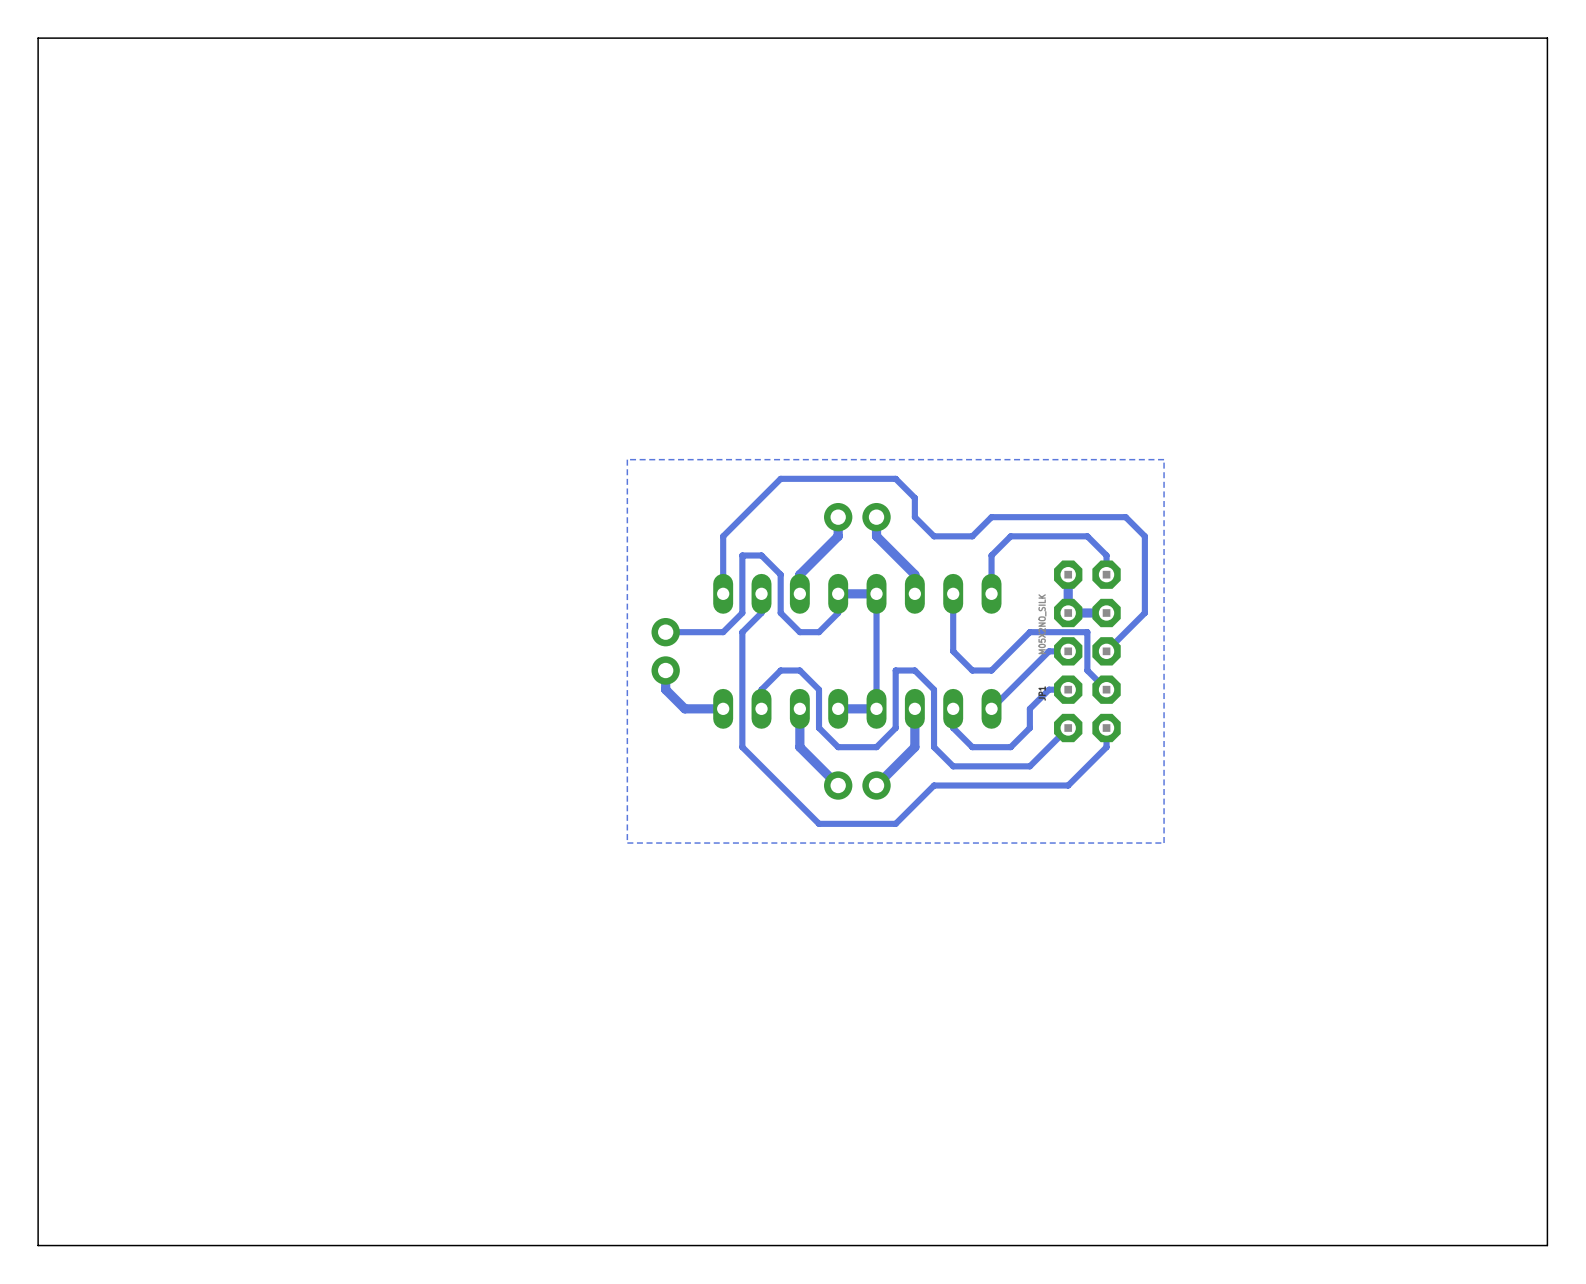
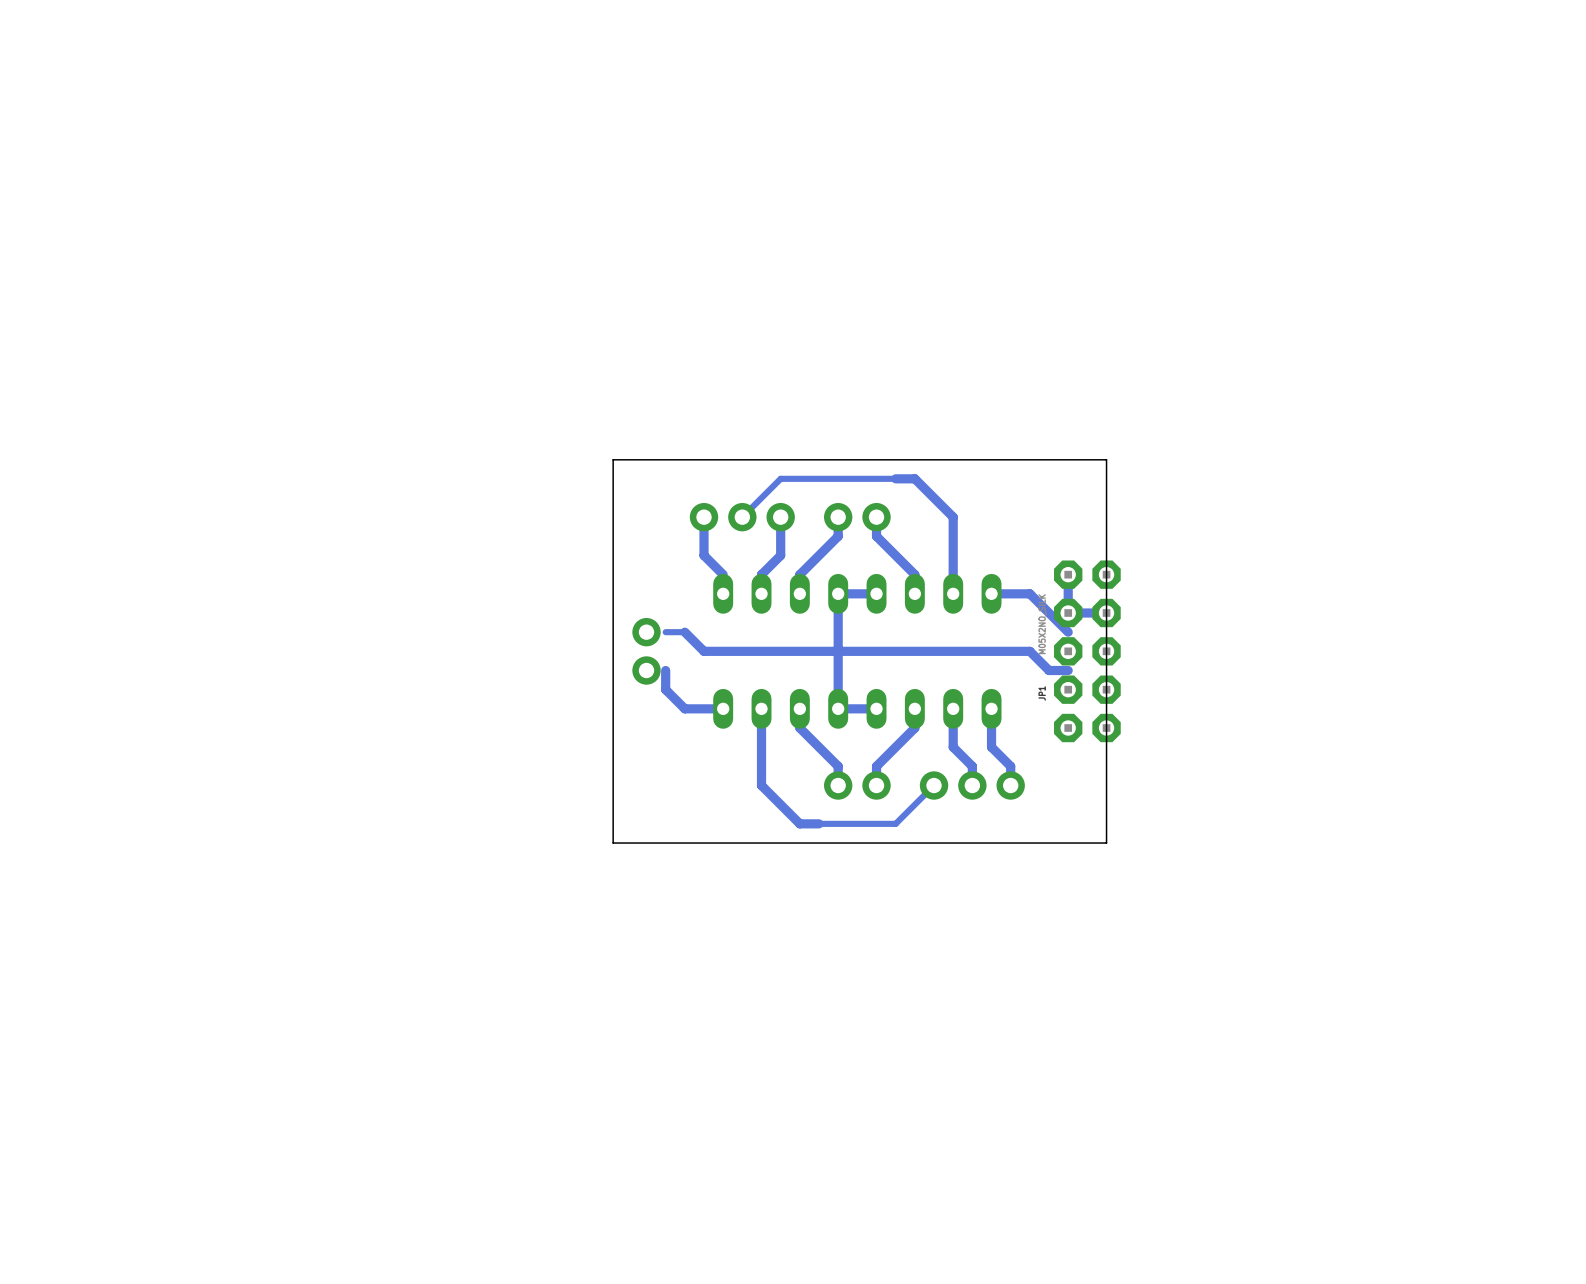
board edge: (1547, 38) (38, 38) (38, 1245) (1547, 1245) (1547, 38) -> none
board edge: none -> (1106, 459) (613, 459) (613, 843) (1106, 843) (1106, 459)
zone outline: (1164, 459) (627, 459) (627, 843) (1164, 843) (1164, 459) -> none
track: (895, 478) (914, 497) (914, 517) (934, 536) (972, 536) (991, 517) (1125, 517) (1144, 536) (1144, 613) (1106, 651) -> (895, 478) (914, 478) (953, 517) (953, 593)
track: (742, 517) (723, 536) (723, 574) -> (704, 517) (704, 555) (723, 574)
part: none -> (742, 517)
track: none -> (780, 517) (780, 555) (761, 574) (761, 593)
track: (1106, 574) (1106, 555) (1087, 536) (1010, 536) (991, 555) (991, 593) -> (1068, 632) (1029, 593) (991, 593)
track: (761, 593) (761, 613) (742, 632) (742, 747) (819, 823) -> (761, 708) (761, 785) (799, 823) (819, 823)
track: (876, 593) (876, 708) -> none
track: (953, 593) (953, 651) (972, 670) (991, 670) (1029, 632) (1087, 632) (1087, 670) (1106, 689) -> none
track: (838, 613) (819, 632) (799, 632) (780, 613) (780, 574) (761, 555) (742, 555) (742, 613) (723, 632) (684, 632) -> (838, 613) (838, 708)
track: none -> (684, 632) (704, 651) (1029, 651) (1049, 670) (1068, 670)
part position: (665, 651) -> (646, 651)
track: (1068, 651) (1049, 651) (991, 708) -> (1010, 785) (1010, 766) (991, 747) (991, 708)
track: (1068, 689) (1049, 689) (1029, 708) (1029, 728) (1010, 747) (972, 747) (953, 728) -> (972, 785) (972, 766) (953, 747) (953, 728)
track: (761, 708) (761, 689) (780, 670) (799, 670) (819, 689) (819, 728) (838, 747) (876, 747) (895, 728) (895, 670) (914, 670) (934, 689) (934, 747) (953, 766) (1029, 766) (1068, 728) -> none
track: (799, 728) (799, 747) (838, 785) -> (799, 728) (838, 766) (838, 785)
track: (914, 728) (914, 747) (876, 785) -> (914, 728) (876, 766) (876, 785)
track: (1106, 728) (1106, 747) (1068, 785) (934, 785) -> none
part: none -> (972, 785)

